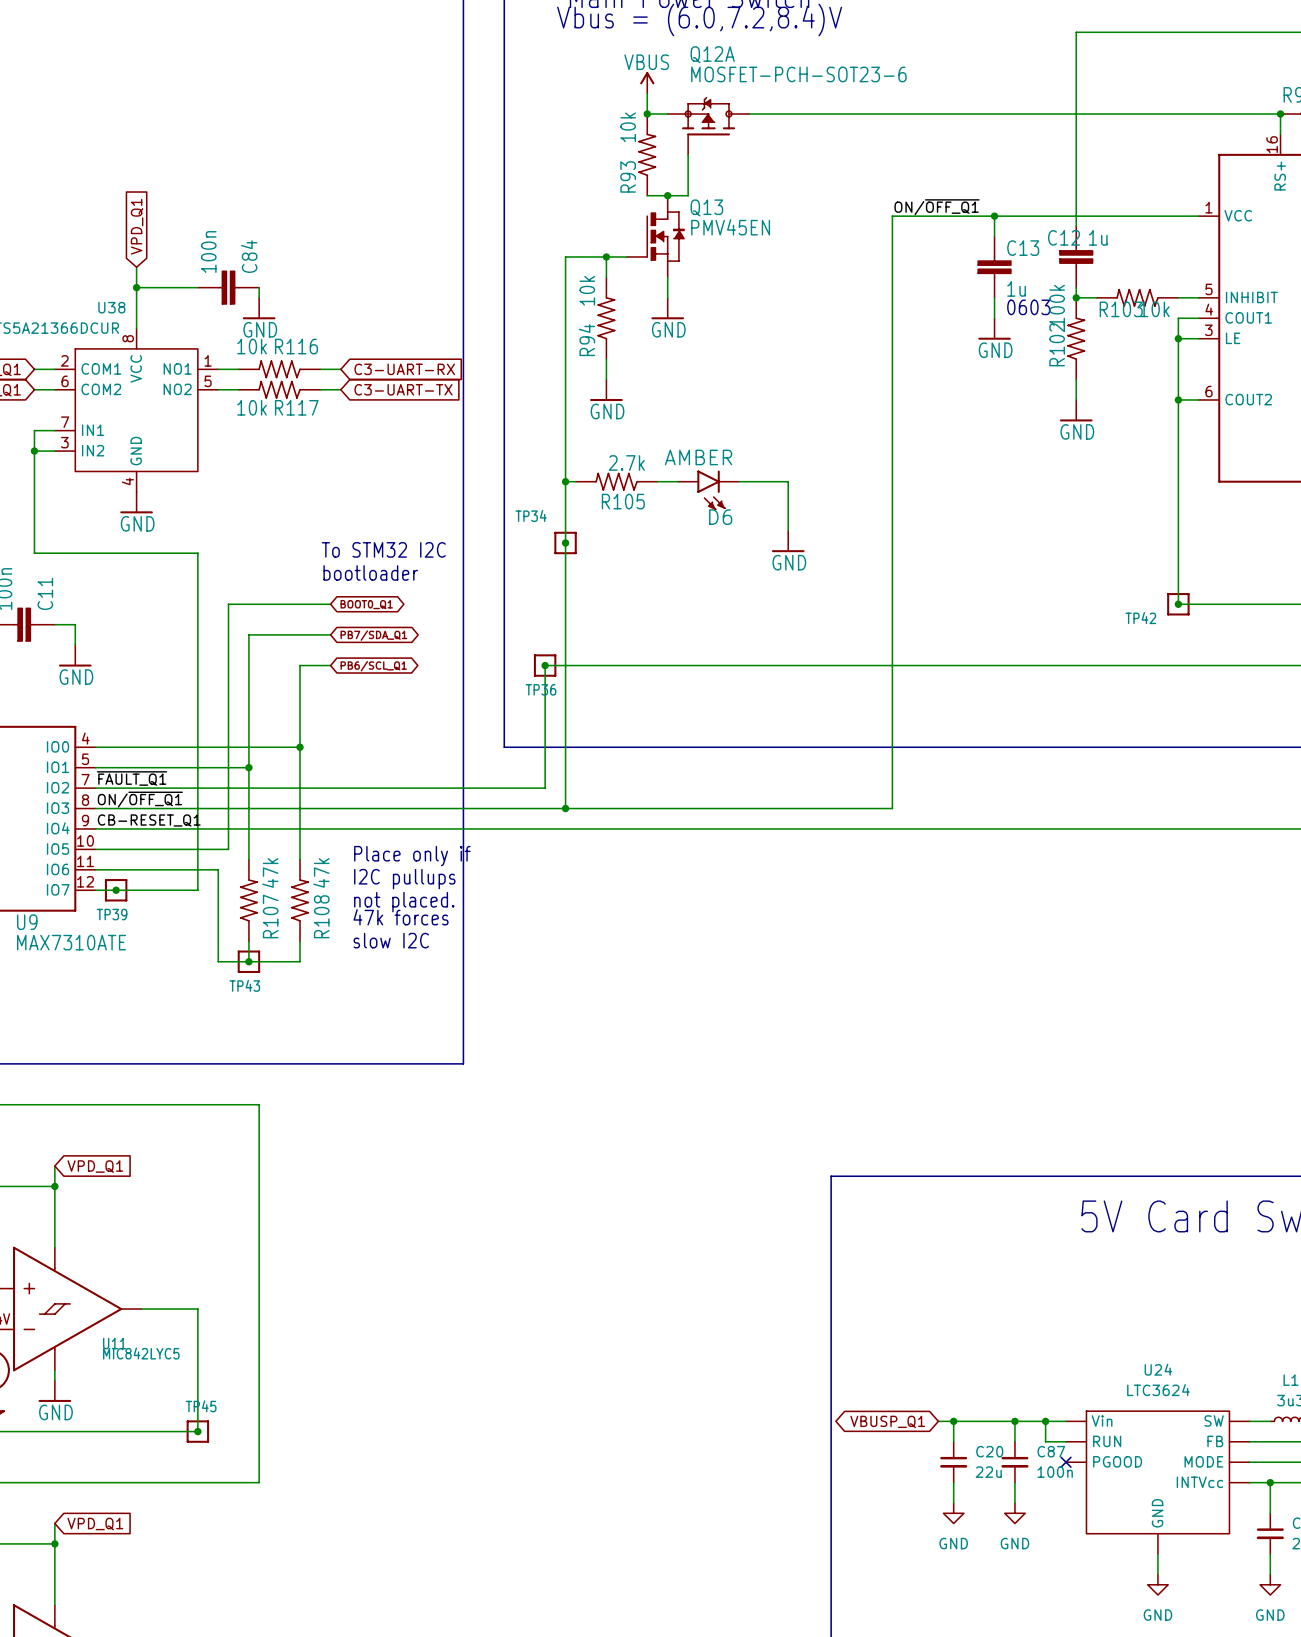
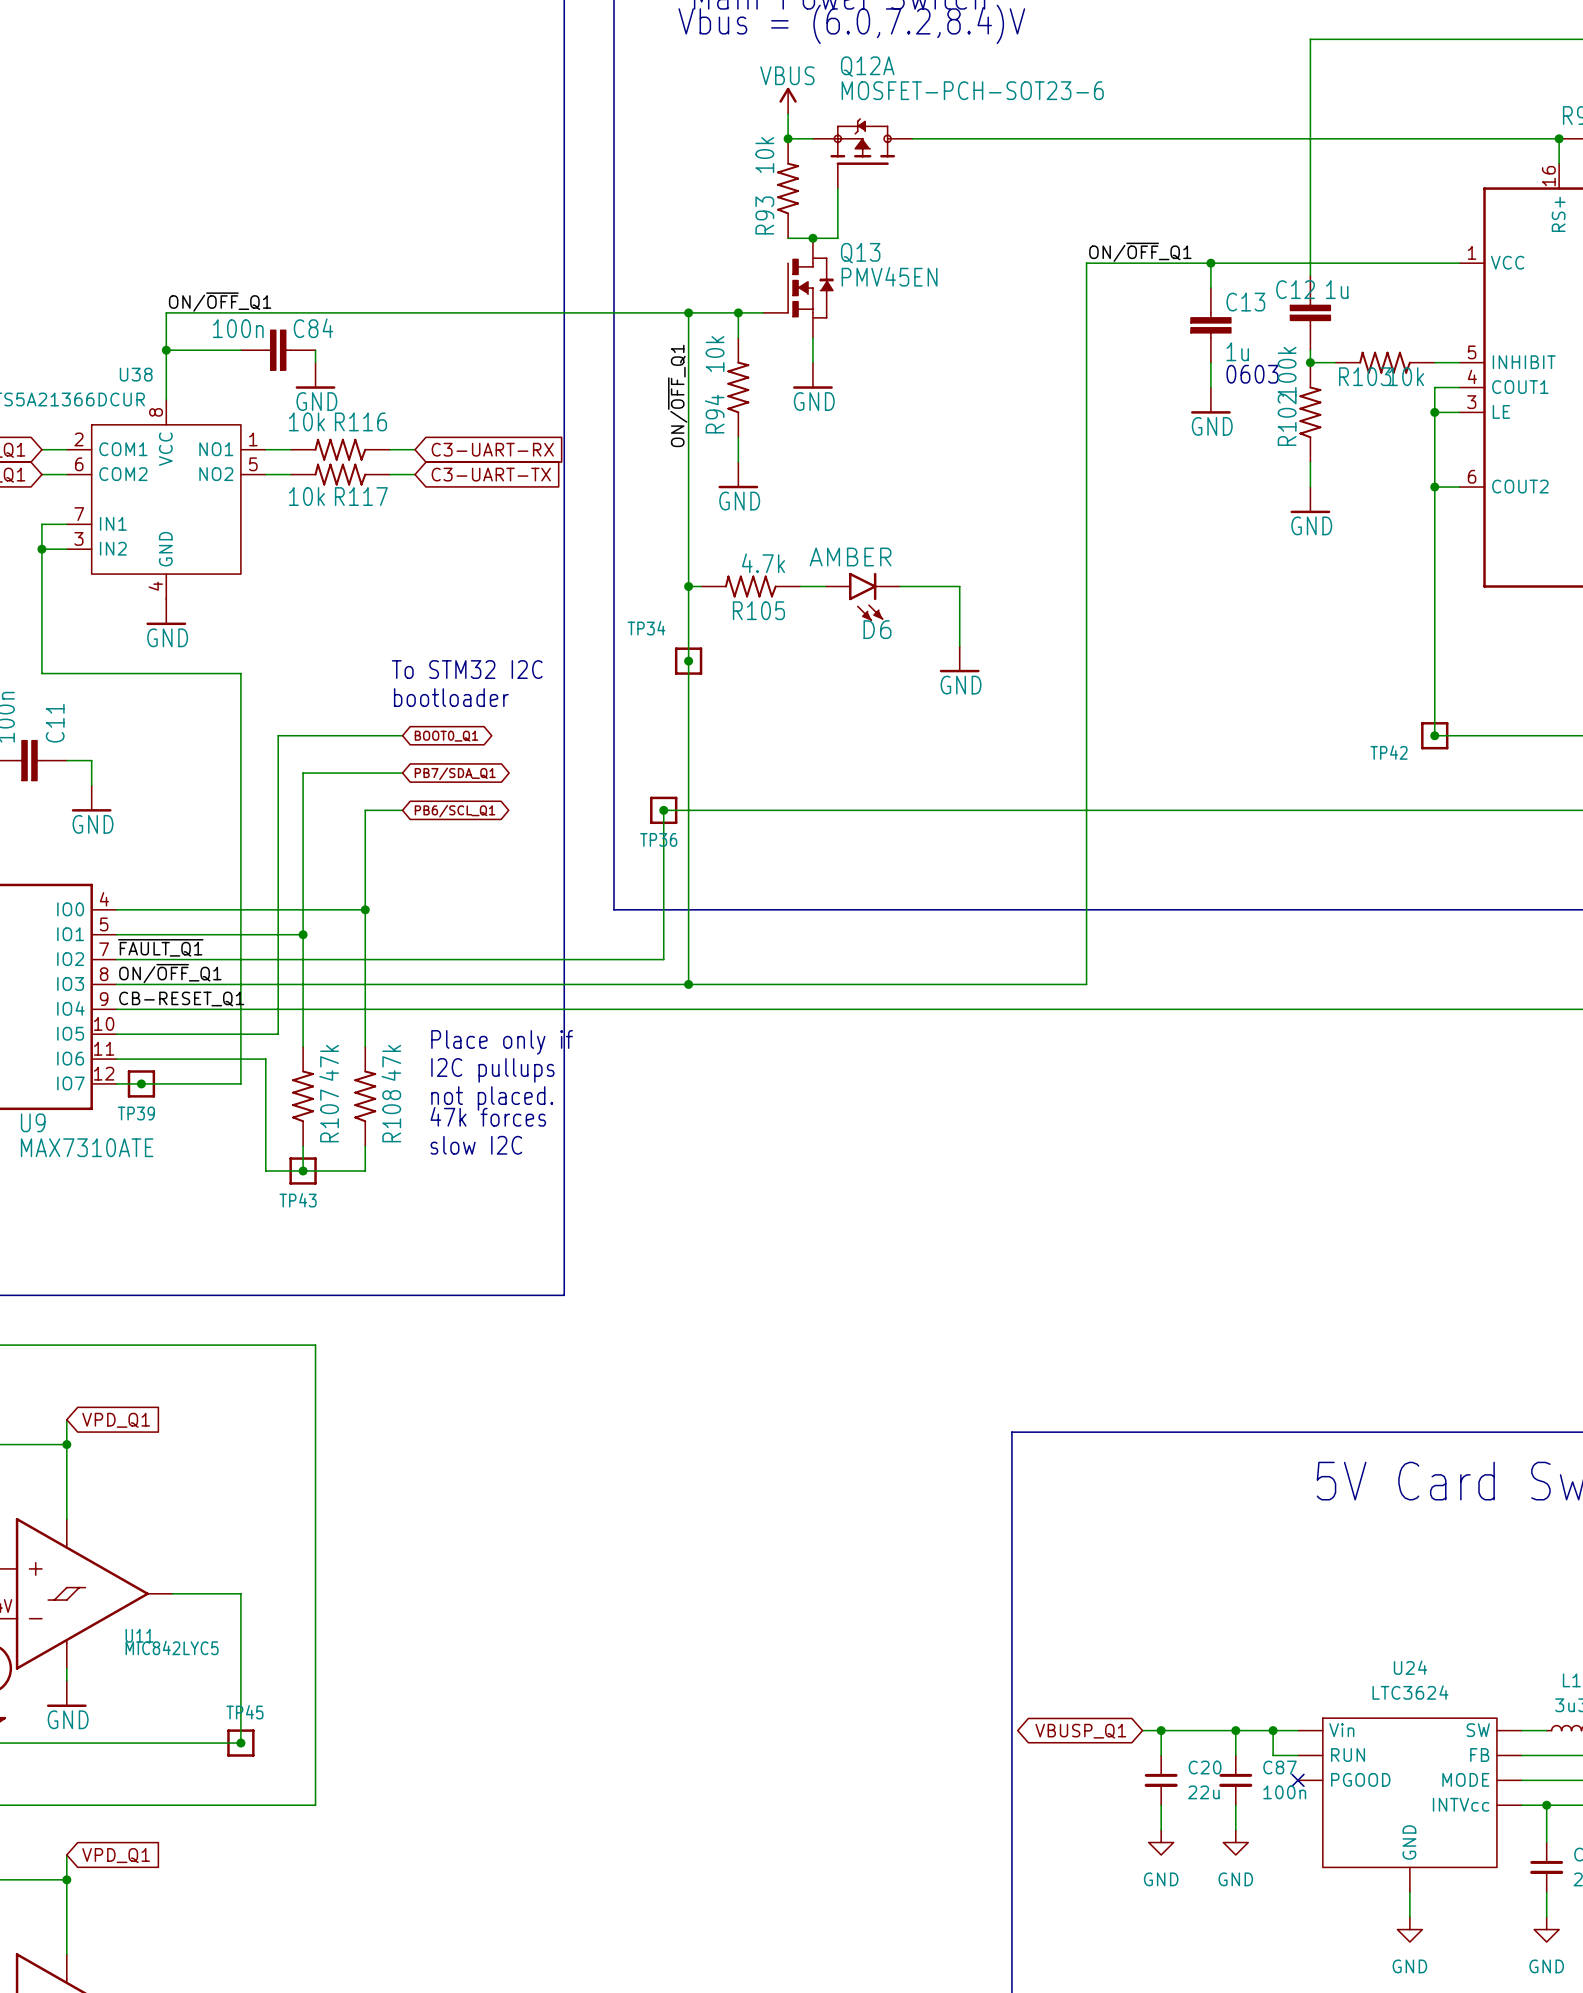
label: ON/~{OFF_Q1} (937, 207) -> ON/~{OFF}_Q1 (1140, 252)
global label: VPD_Q1 (137, 226) -> none
label: none -> ON/~{OFF}_Q1 (220, 302)
C84 value rotation: 0° (208, 252) -> 90° clockwise (238, 328)
C84 name rotation: 0° (249, 256) -> 90° clockwise (313, 328)
wire: none -> (688, 312) (166, 312) (166, 325)
junction: none -> (688, 312)
label: none -> ON/~{OFF}_Q1 (677, 395)
R105 value: 2.7k (626, 462) -> 4.7k (763, 563)
label: ON/~{OFF_Q1} (140, 799) -> ON/~{OFF}_Q1 (170, 973)

